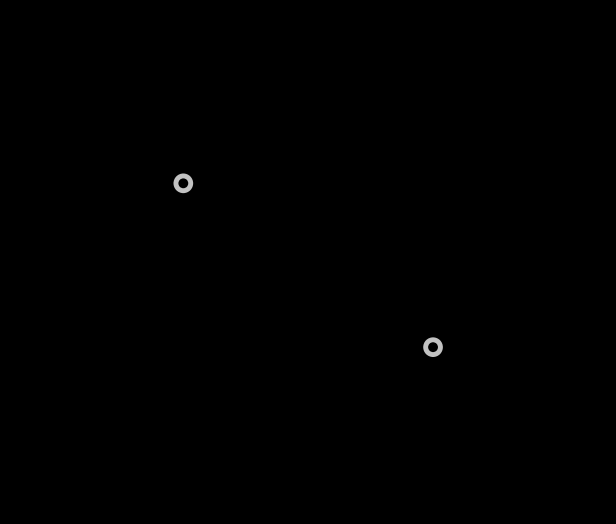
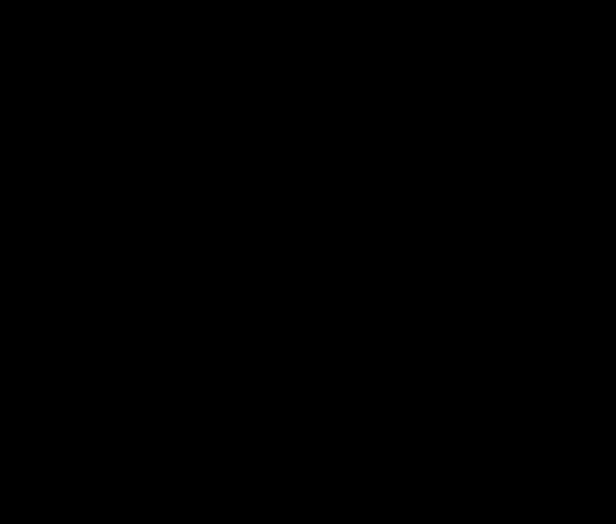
via: (183, 183) -> none
via: (433, 347) -> none

